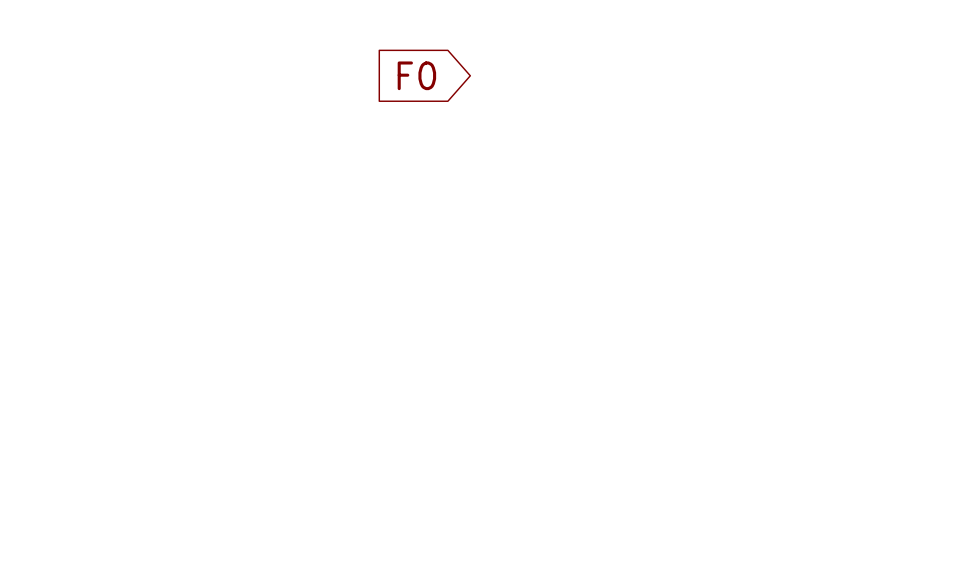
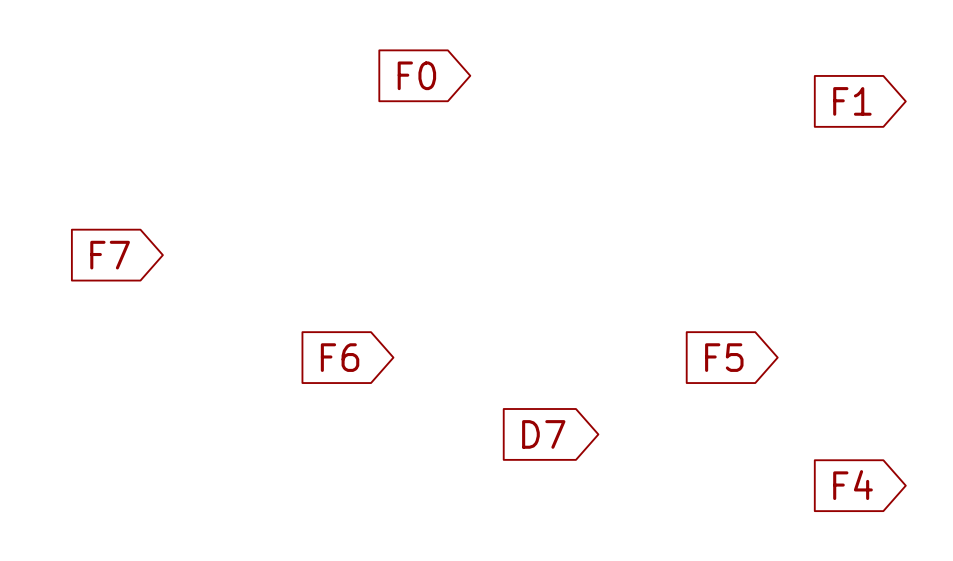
global label: none -> F1 (852, 101)
global label: none -> F7 (110, 255)
global label: none -> F6 (340, 357)
global label: none -> F5 (724, 357)
global label: none -> D7 (543, 434)
global label: none -> F4 (853, 485)

